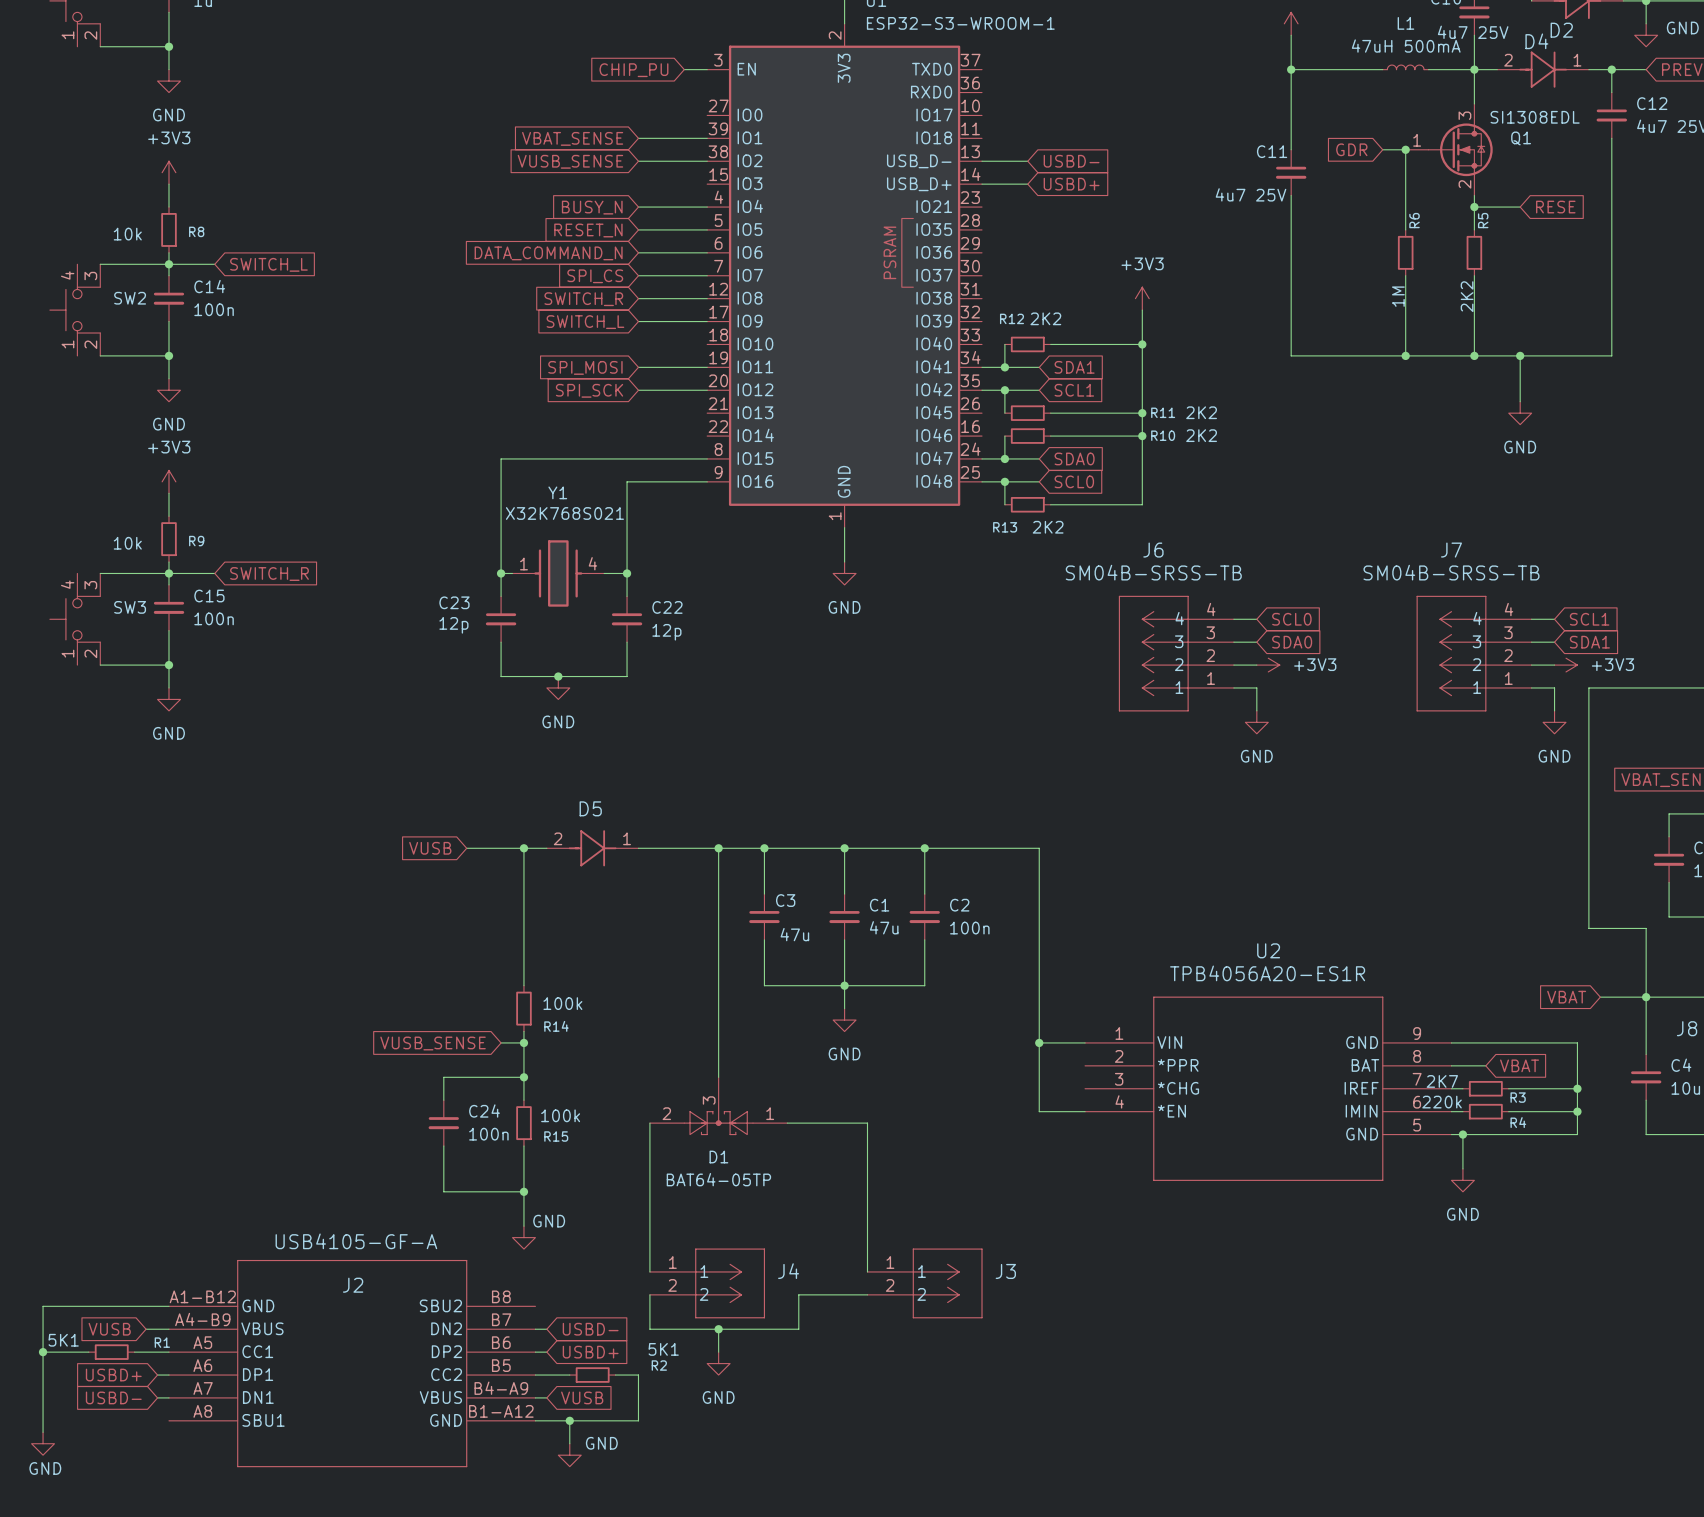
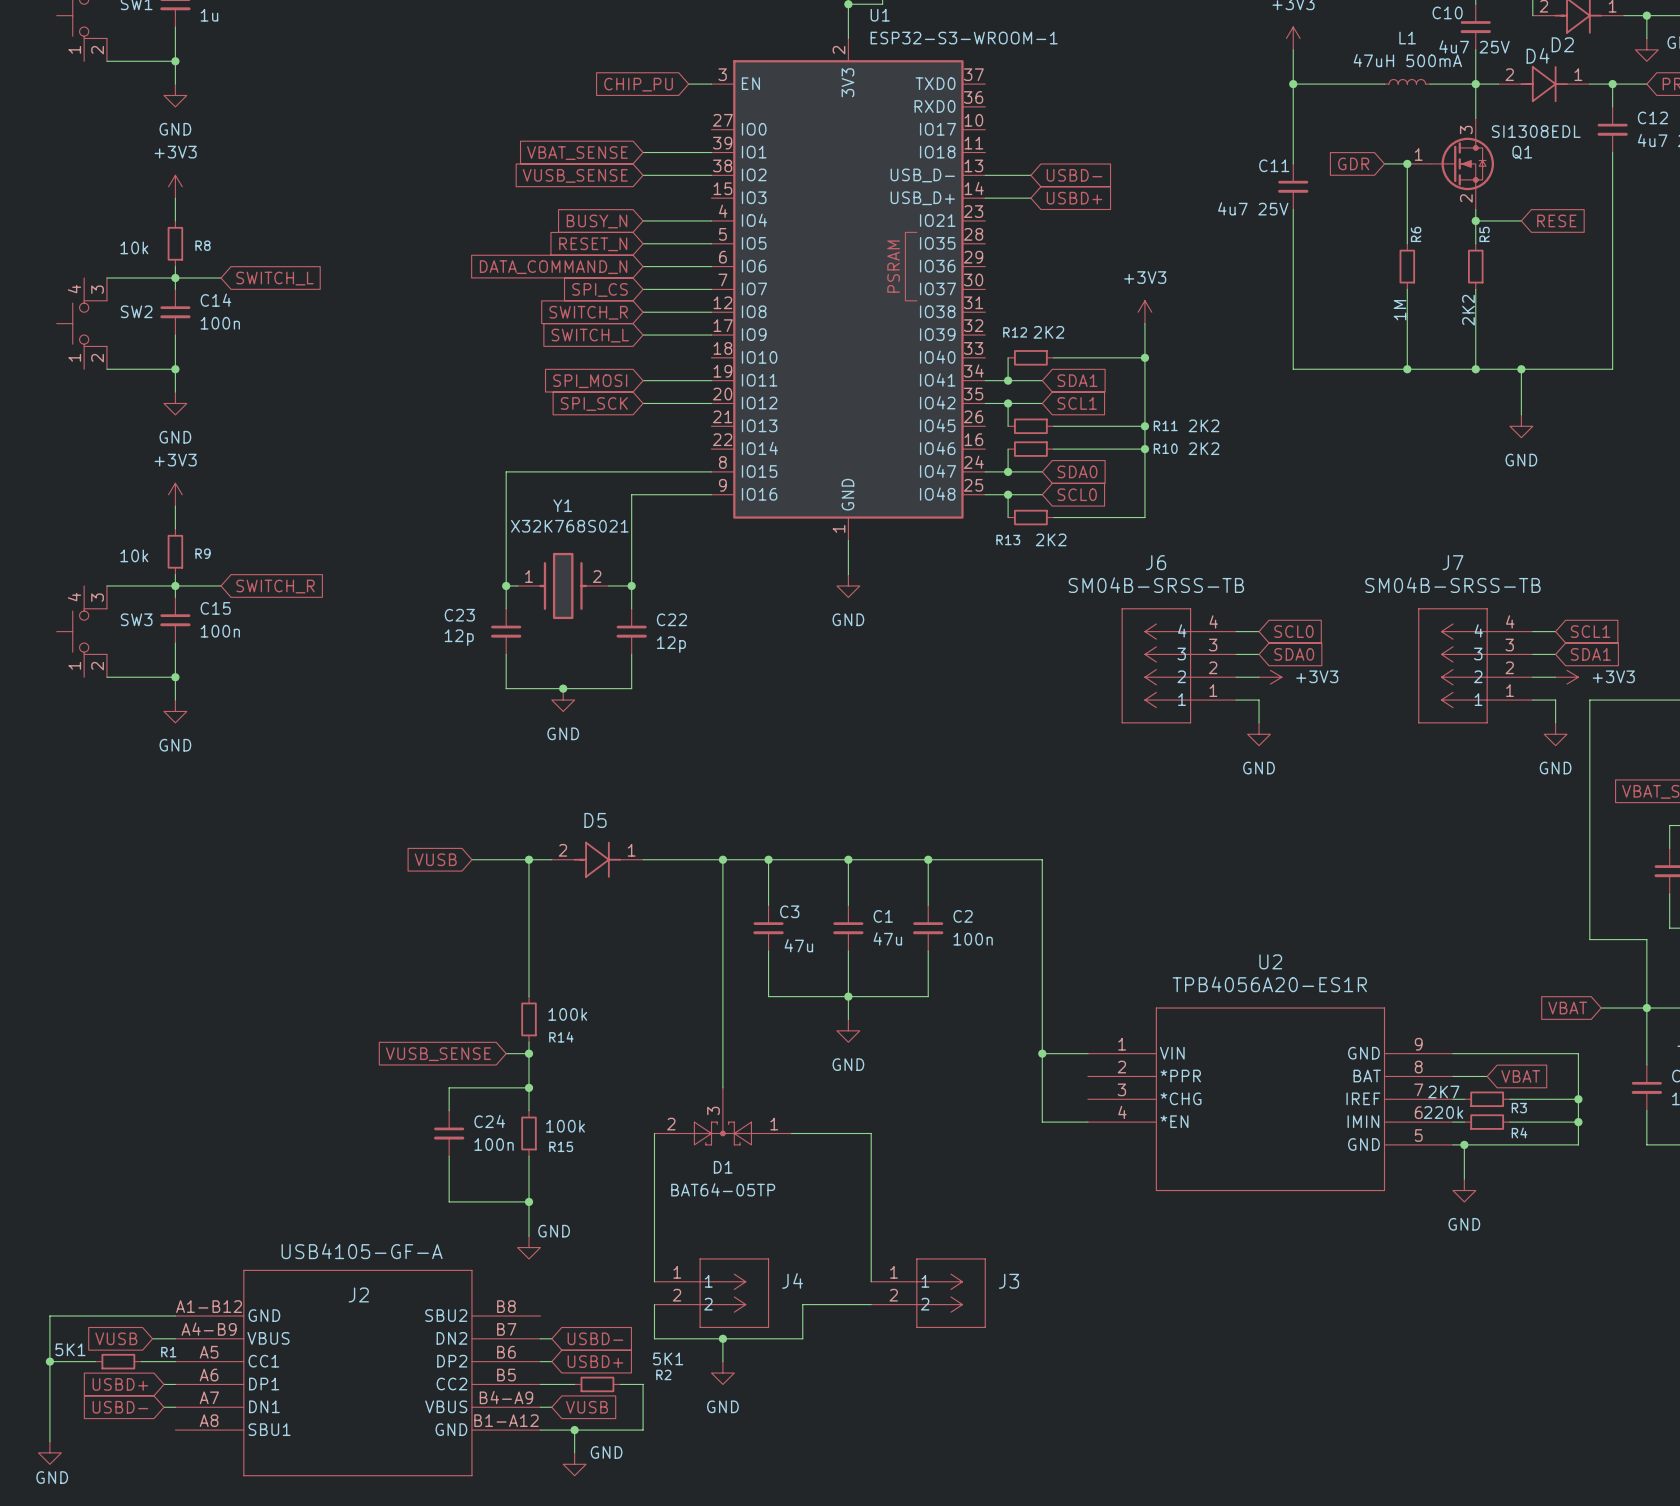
Y1 pin number: 4 (592, 563) -> 2 (597, 576)

